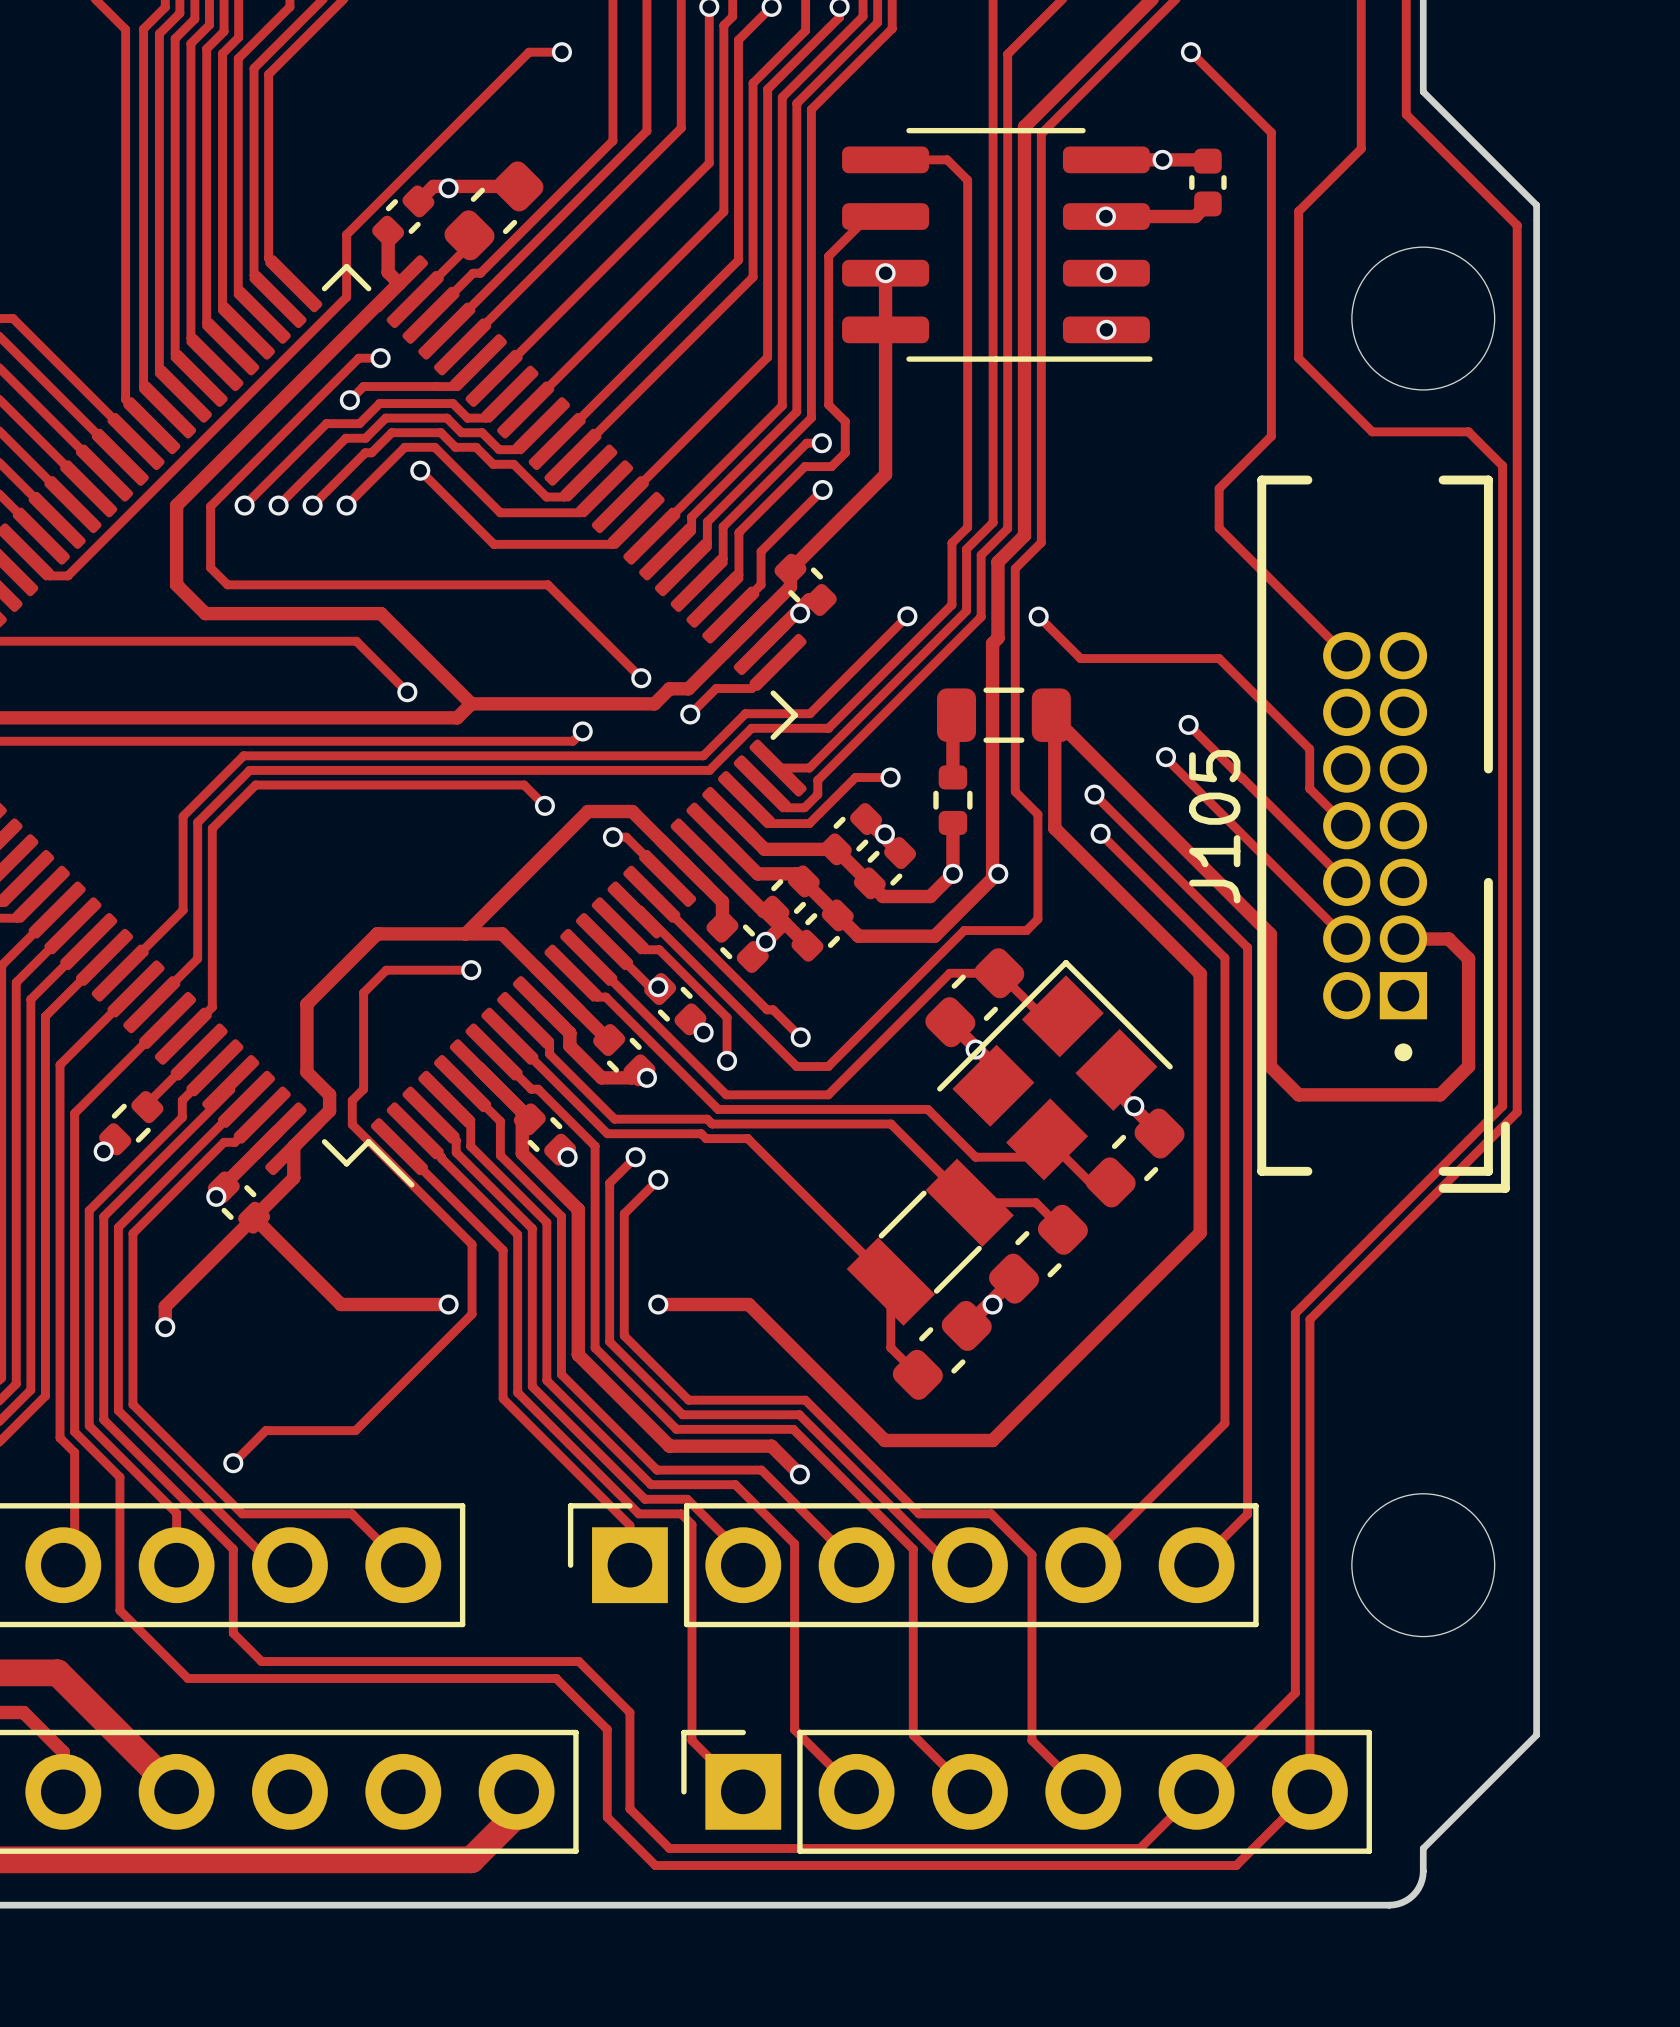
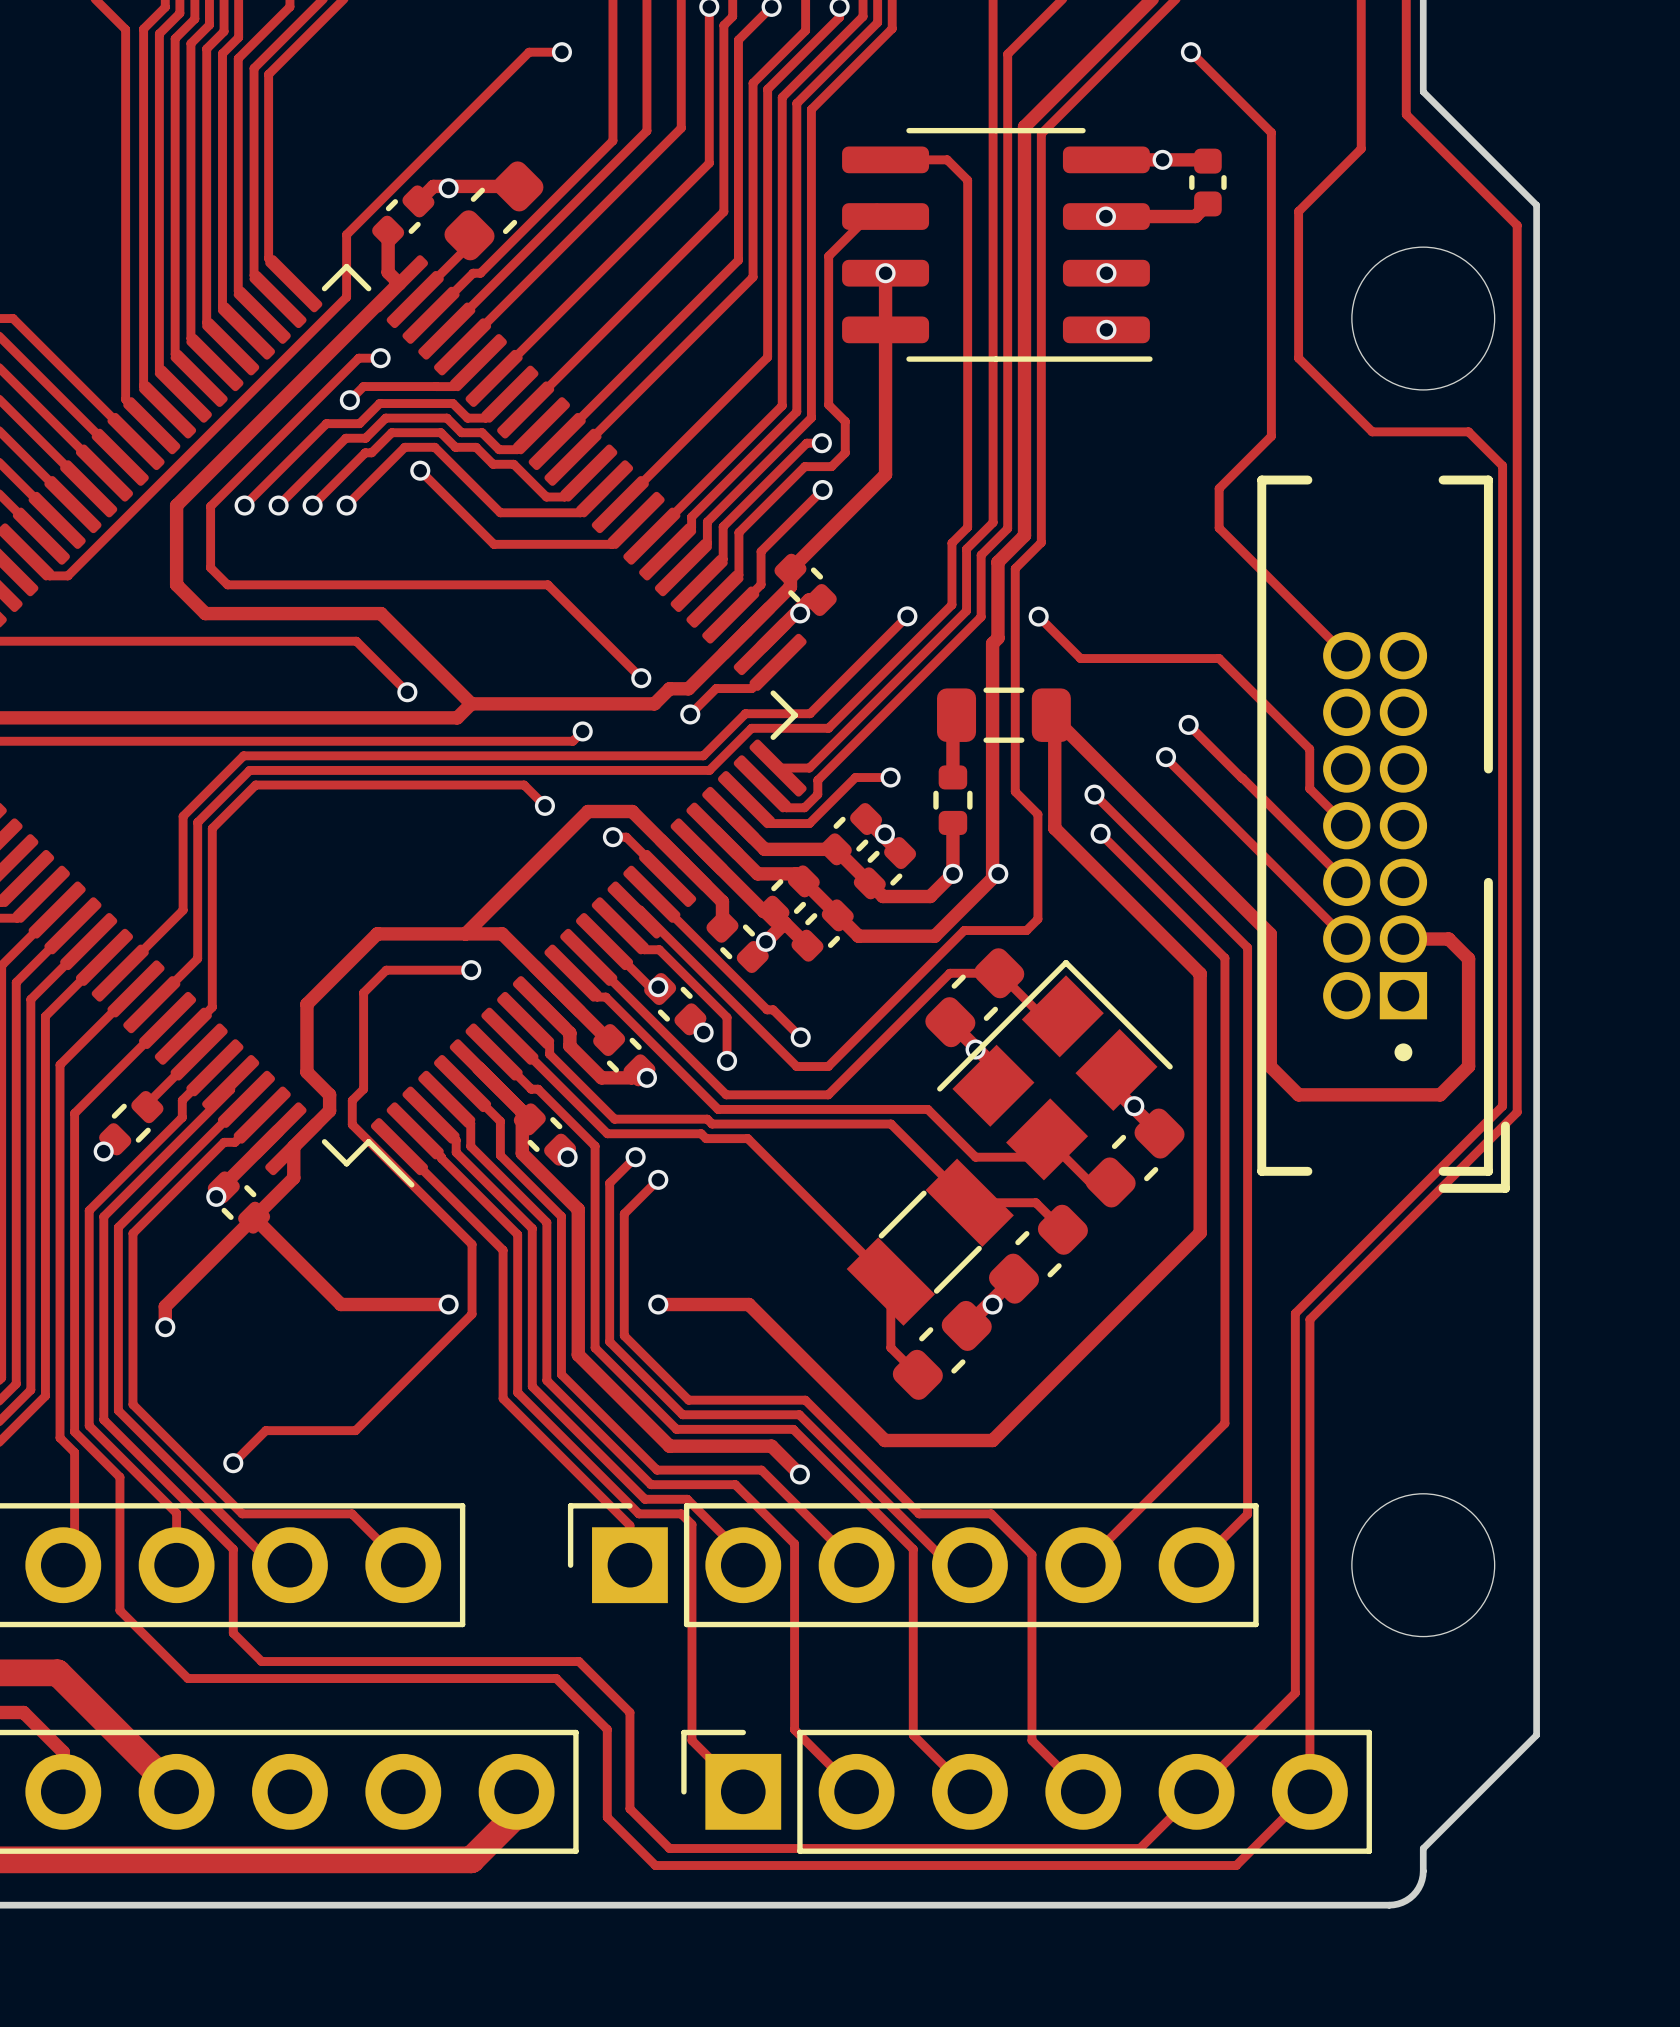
J105 name: J105 (1214, 826) -> none

